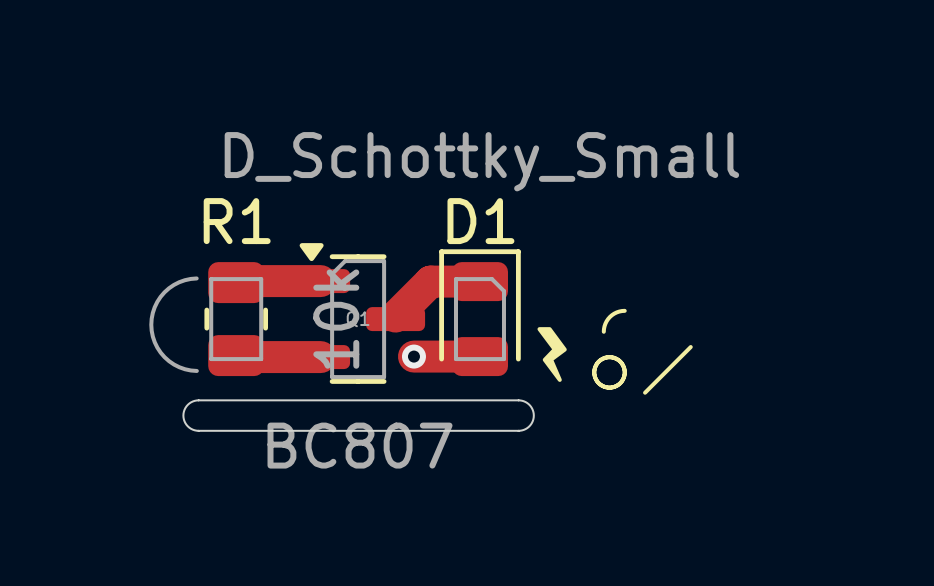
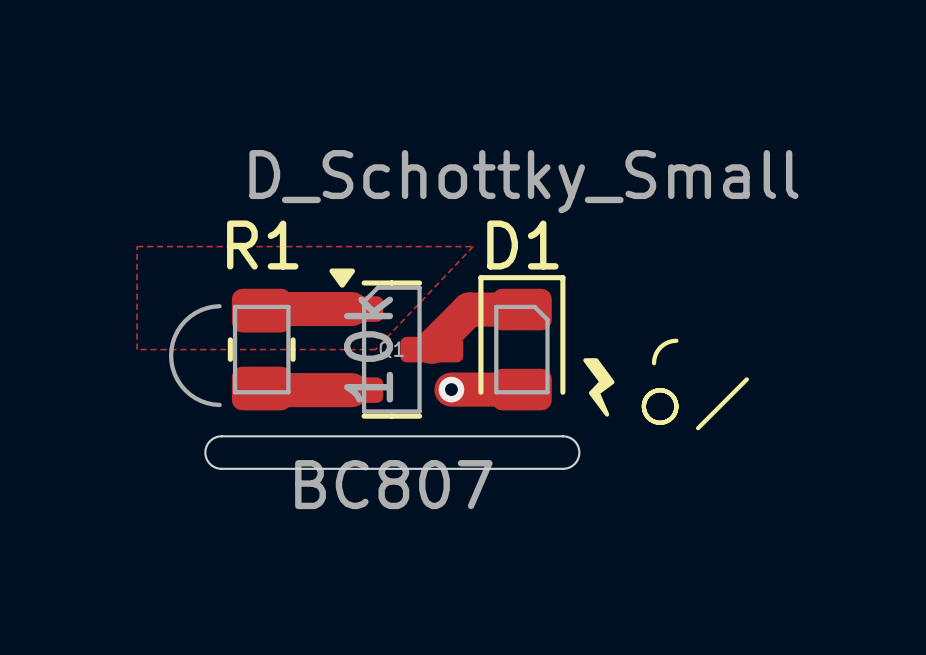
zone outline: none -> (137, 246) (473, 246) (375, 349) (137, 349) (137, 246)

